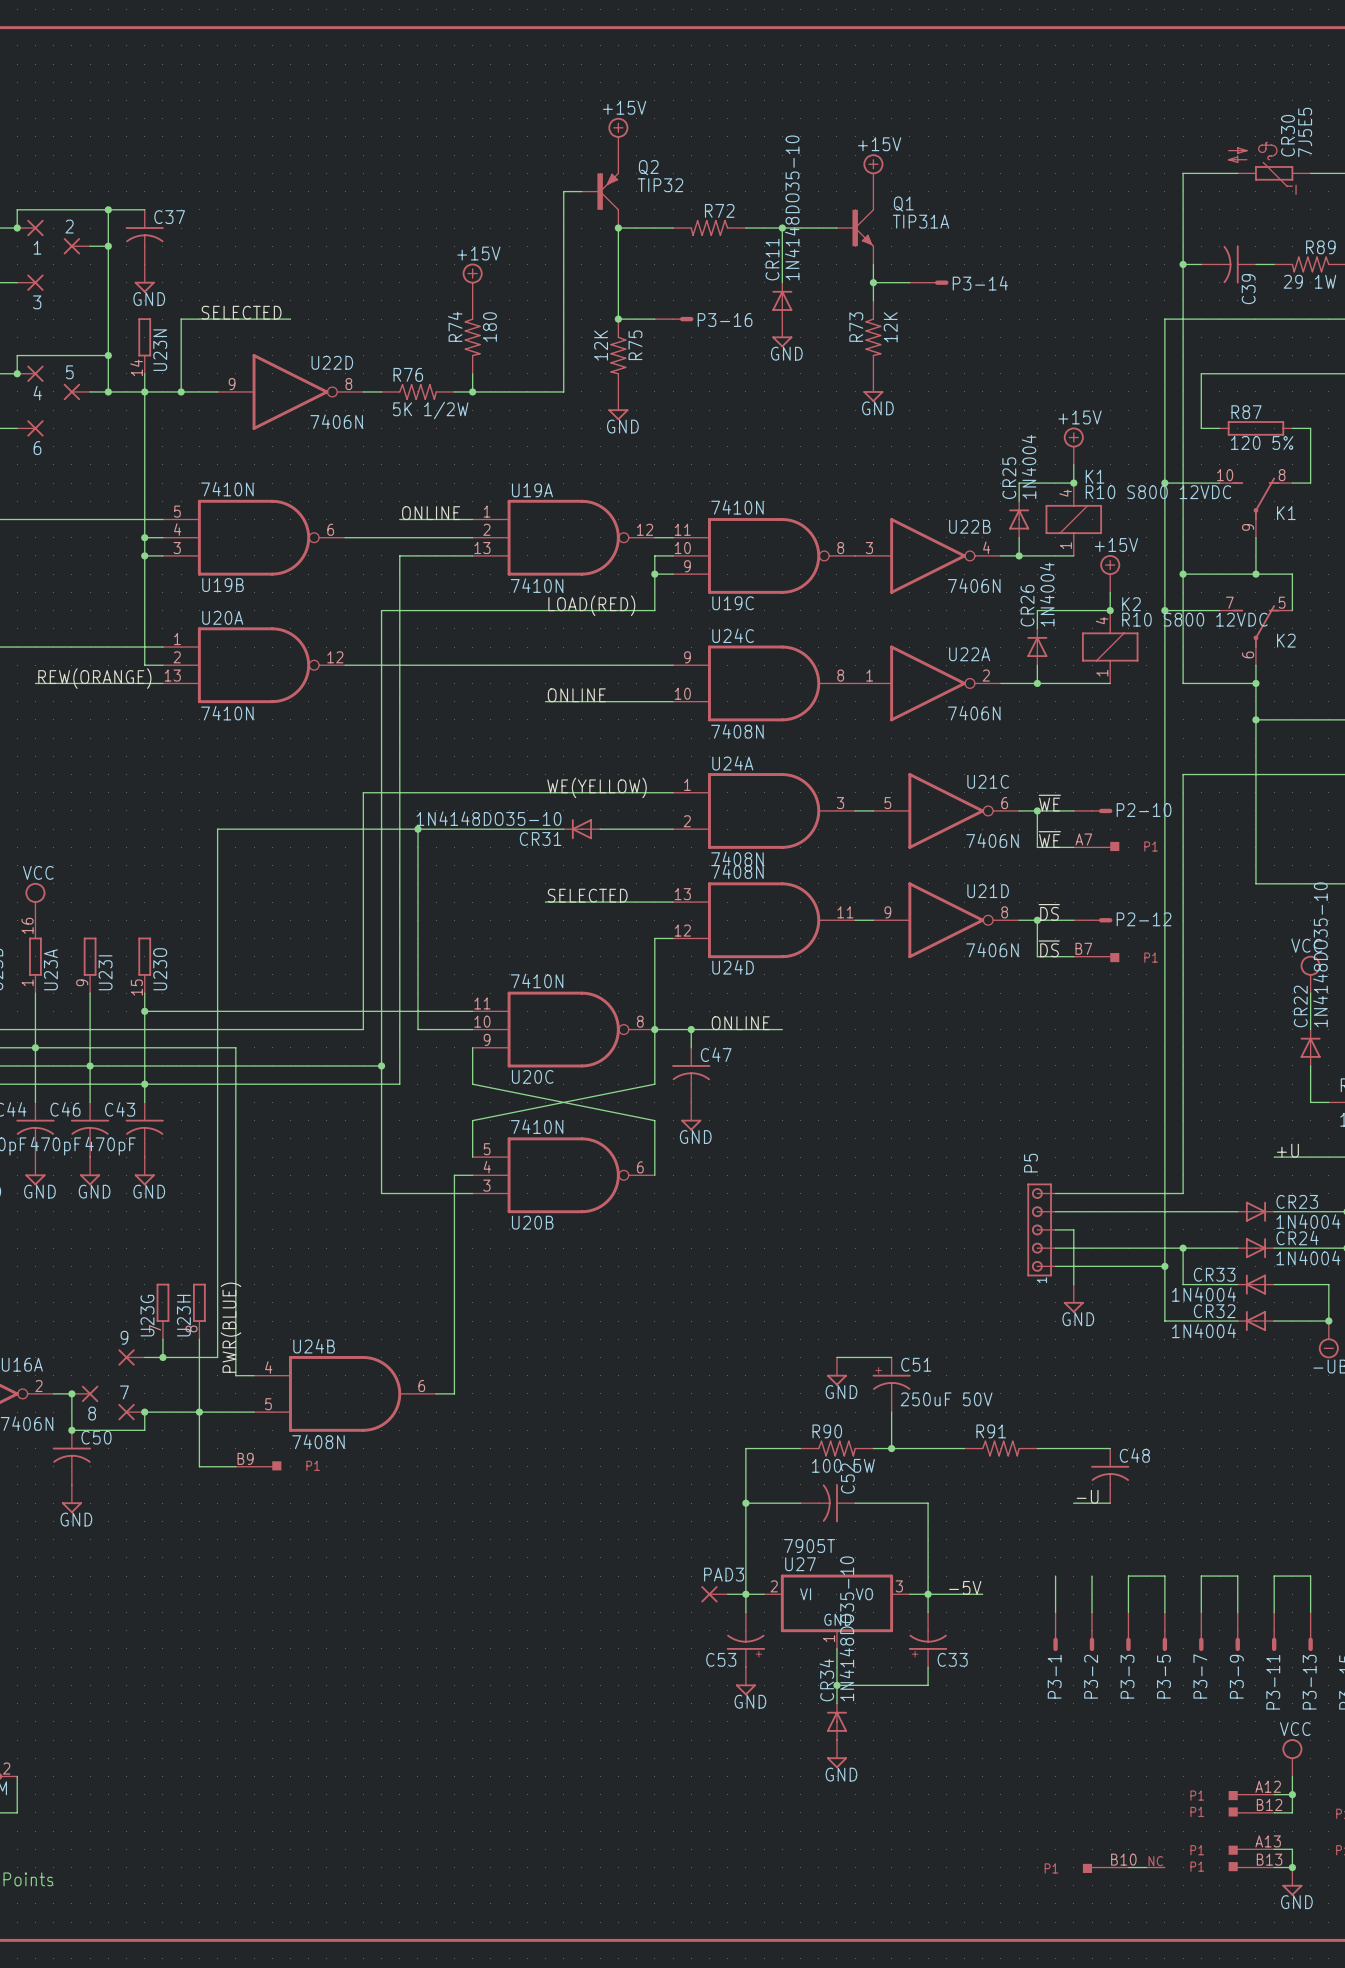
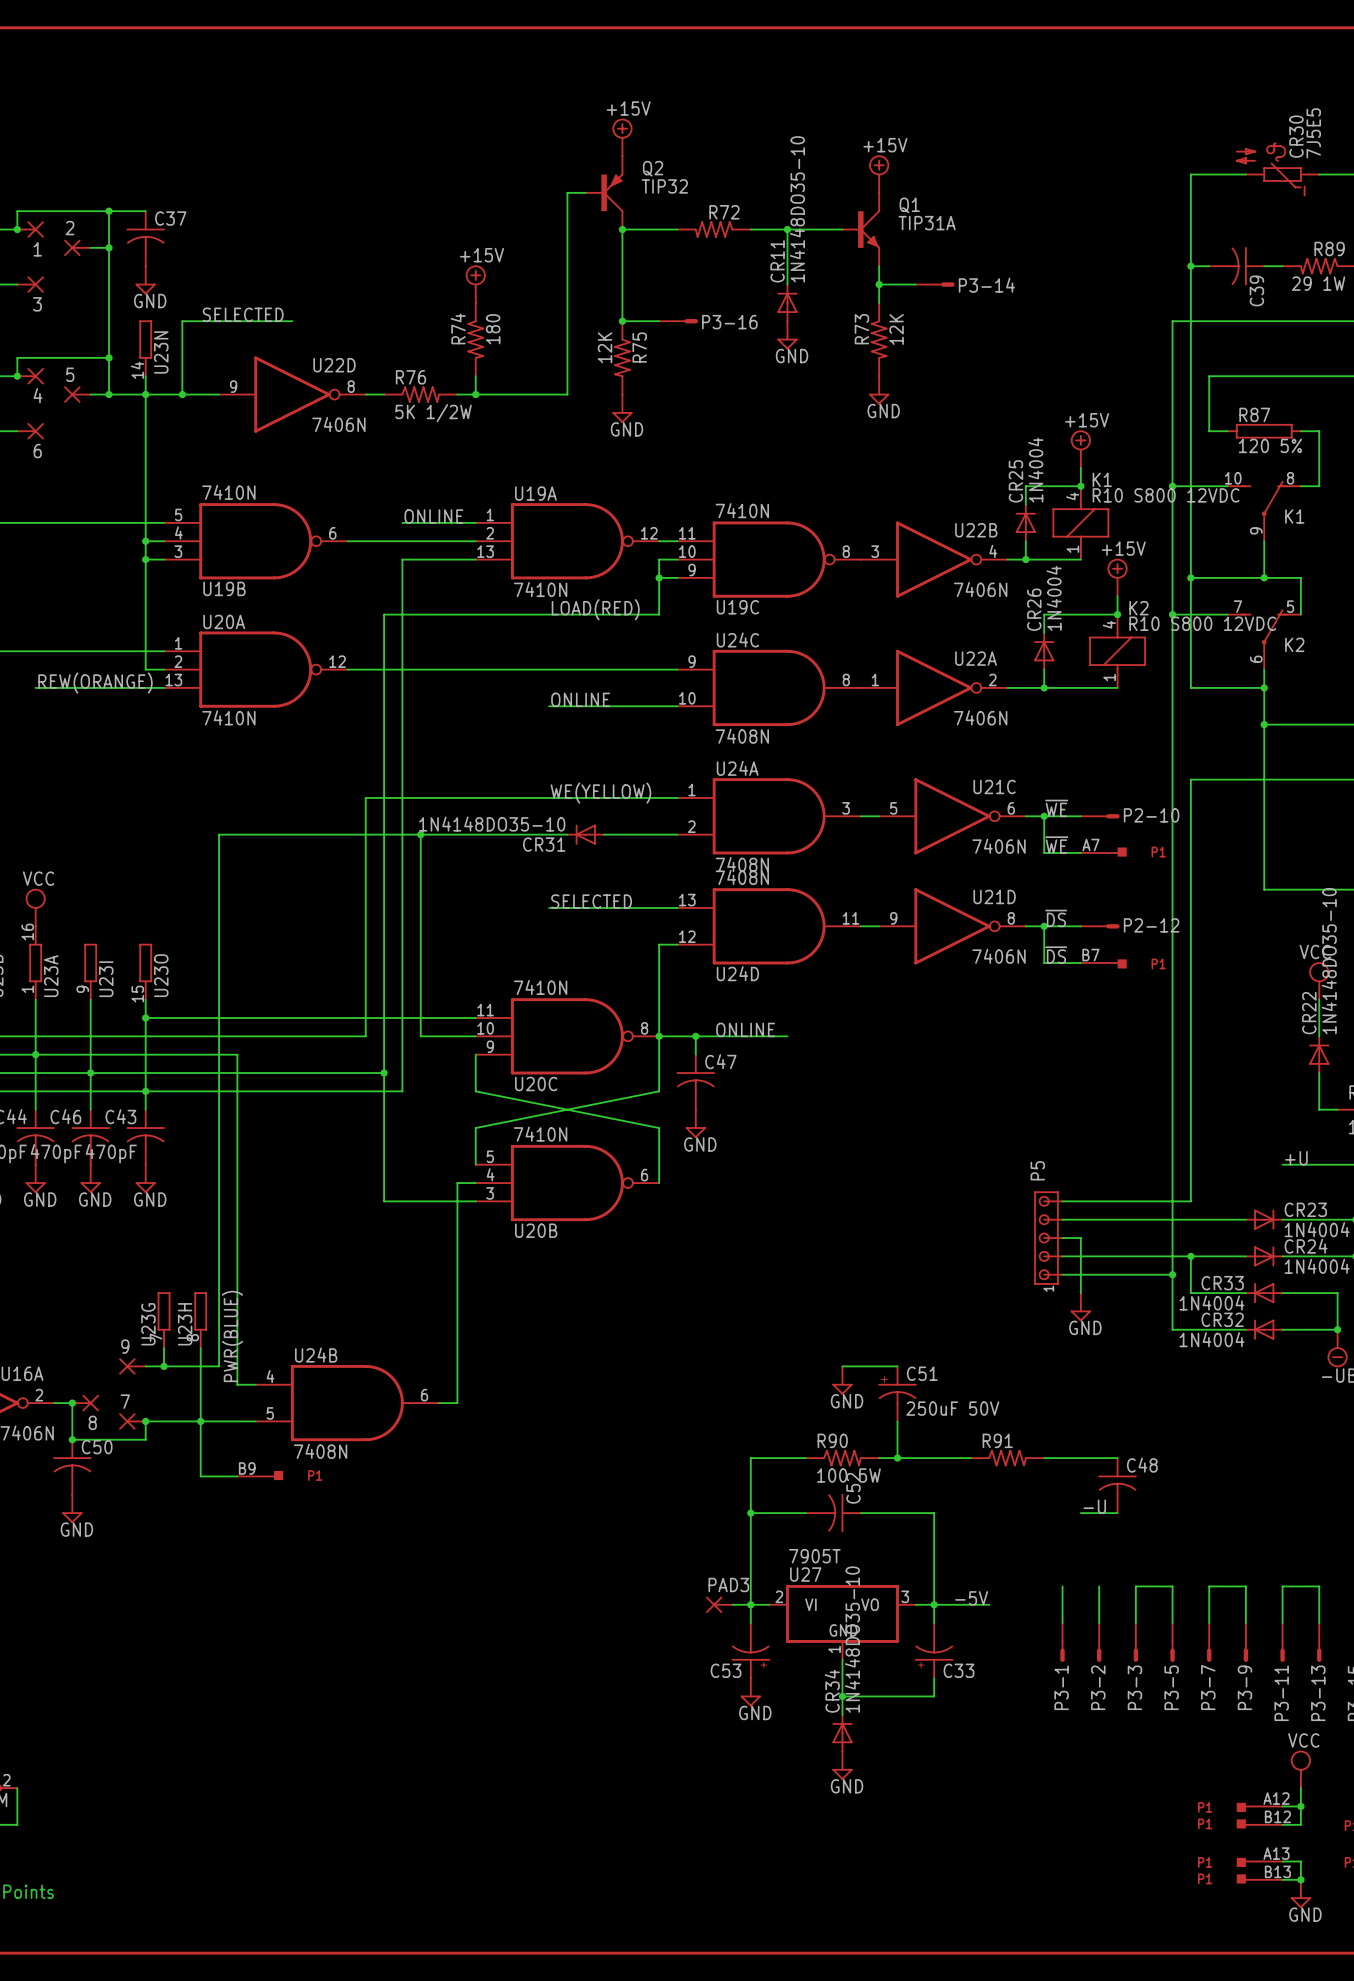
wire: (1128, 1867) (1146, 1867) -> none
power symbol: (1155, 1867) -> none
P1: (1105, 1868) -> none

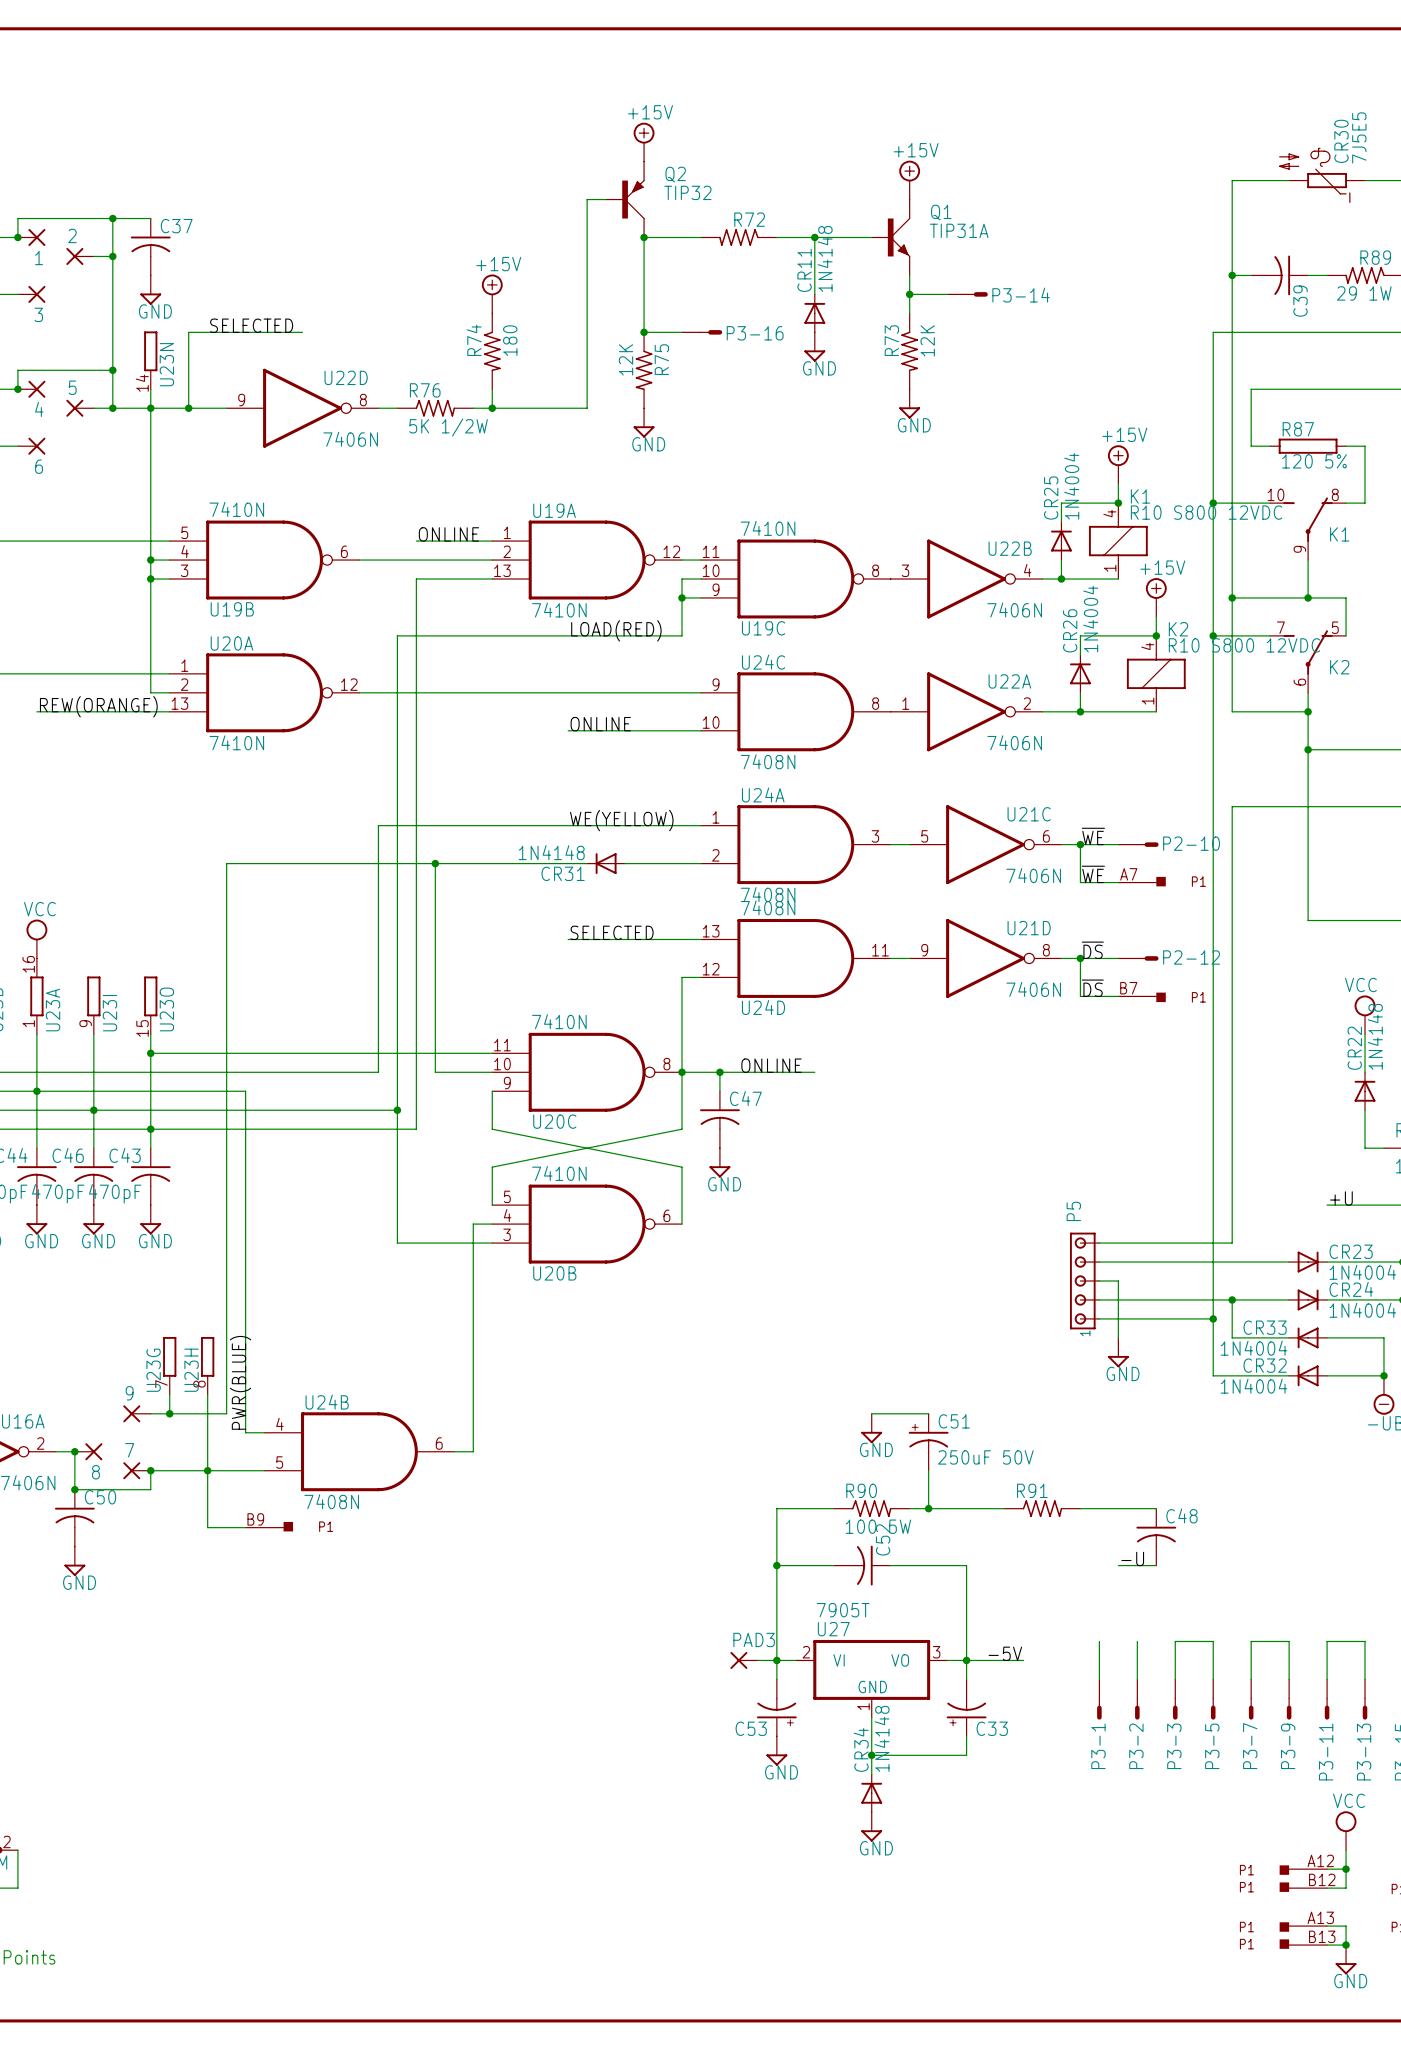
CR11 value: 1N4148DO35-10 (797, 209) -> 1N4148 (825, 258)
CR31 value: 1N4148DO35-10 (492, 824) -> 1N4148 (551, 852)
CR22 value: 1N4148DO35-10 (1329, 961) -> 1N4148 (1375, 1036)
CR34 value: 1N4148DO35-10 (852, 1639) -> 1N4148 (882, 1738)

